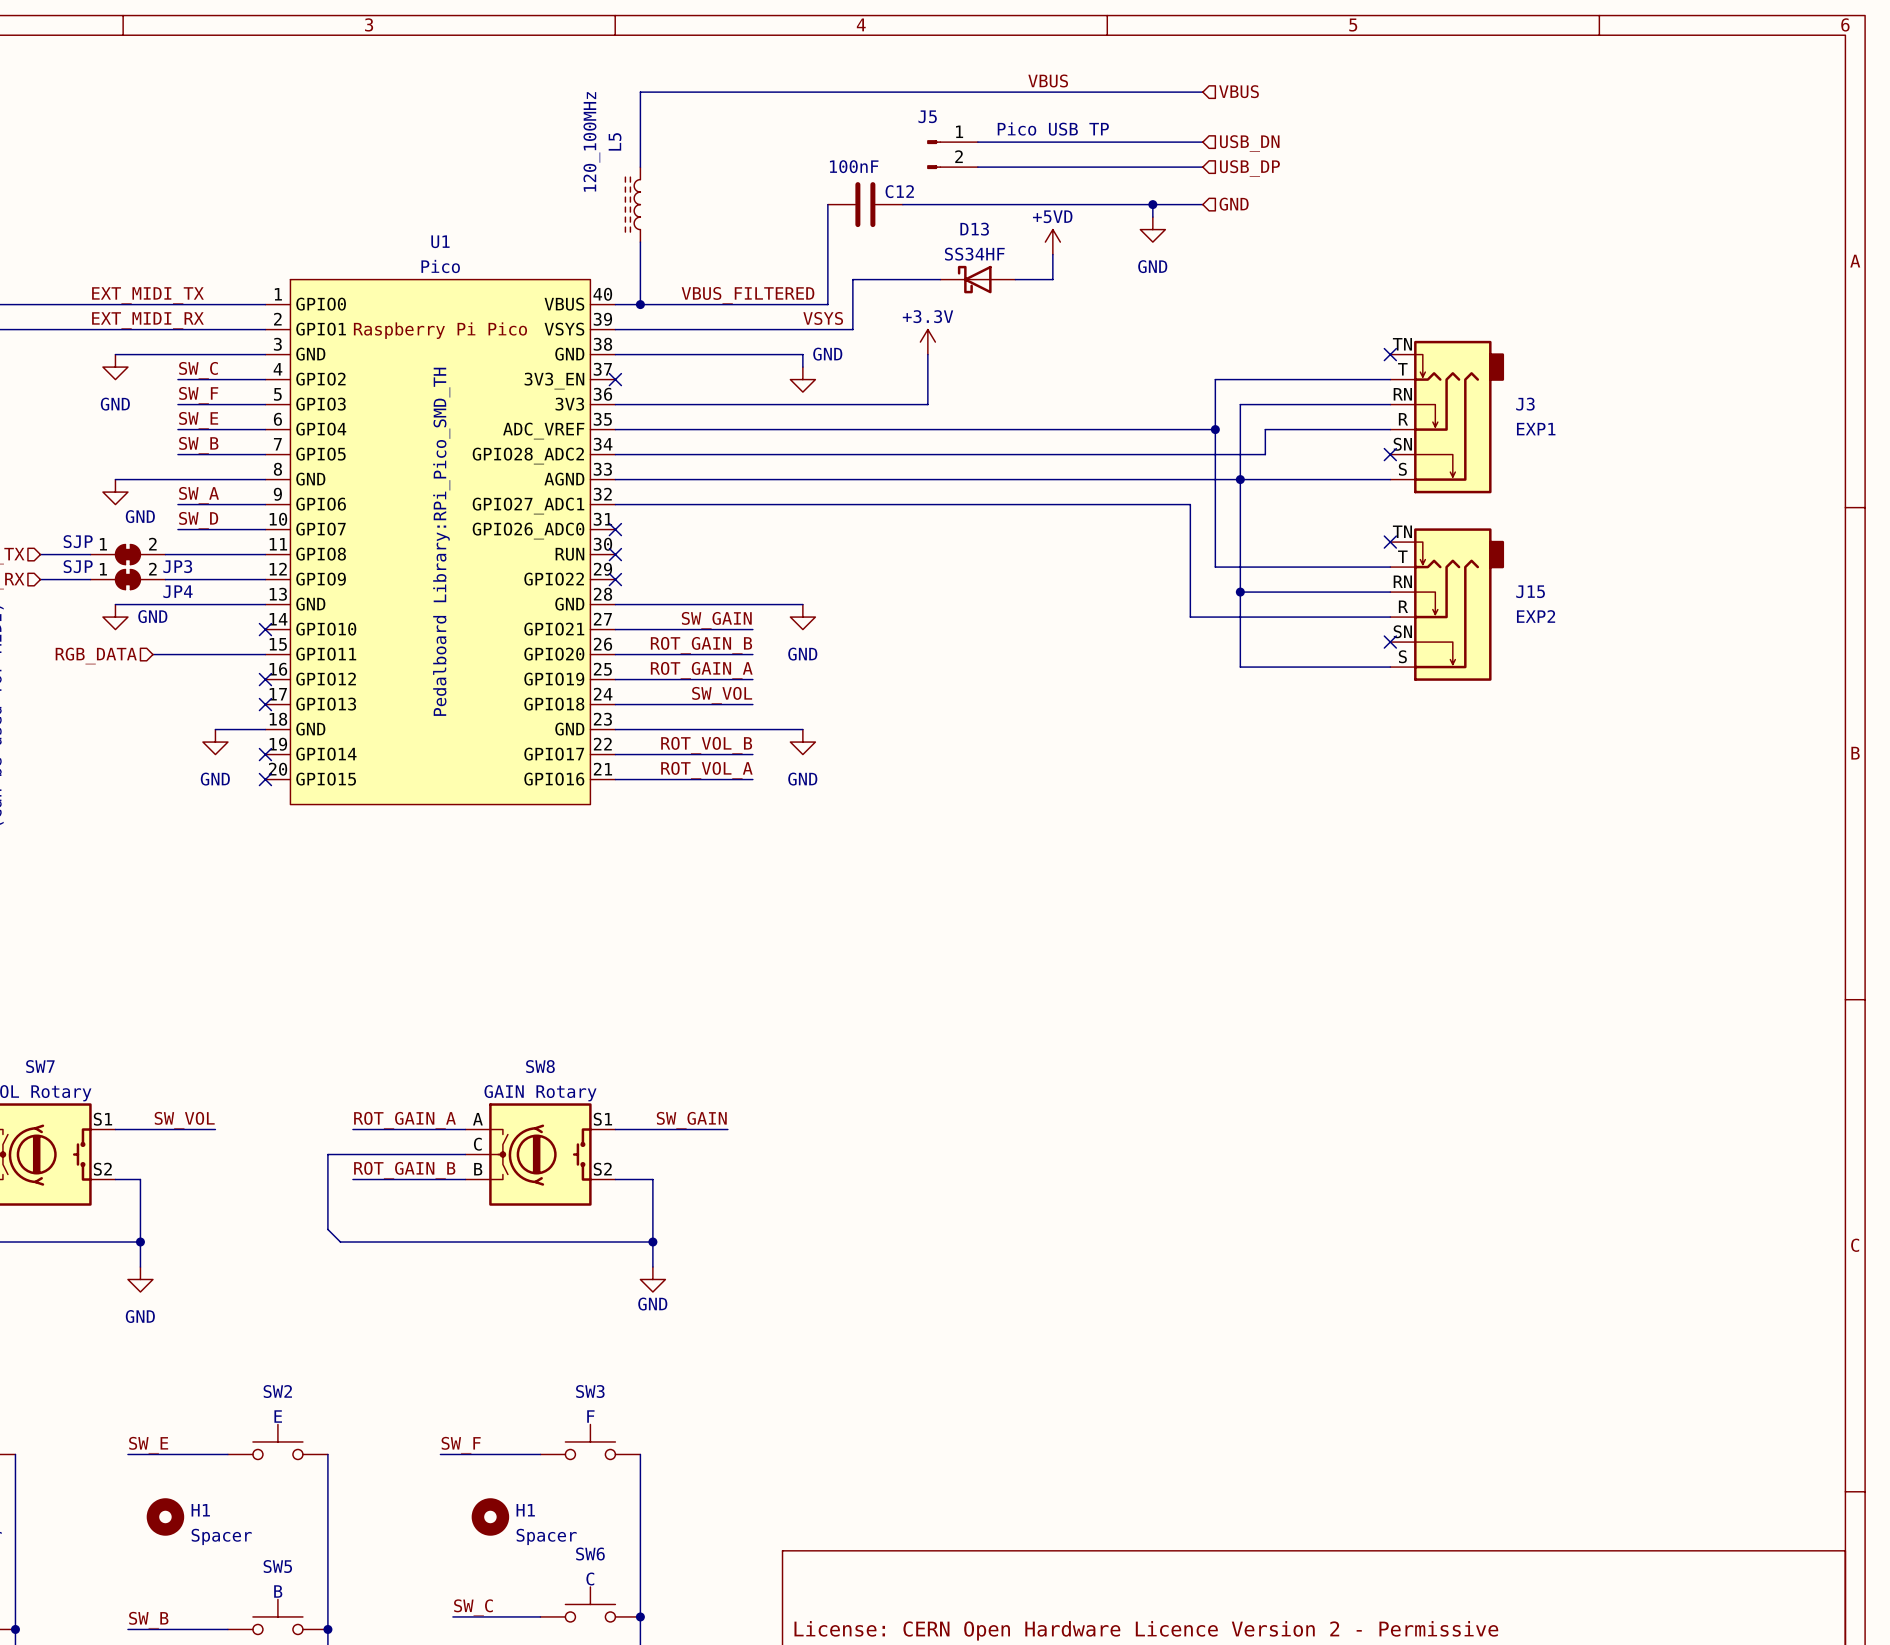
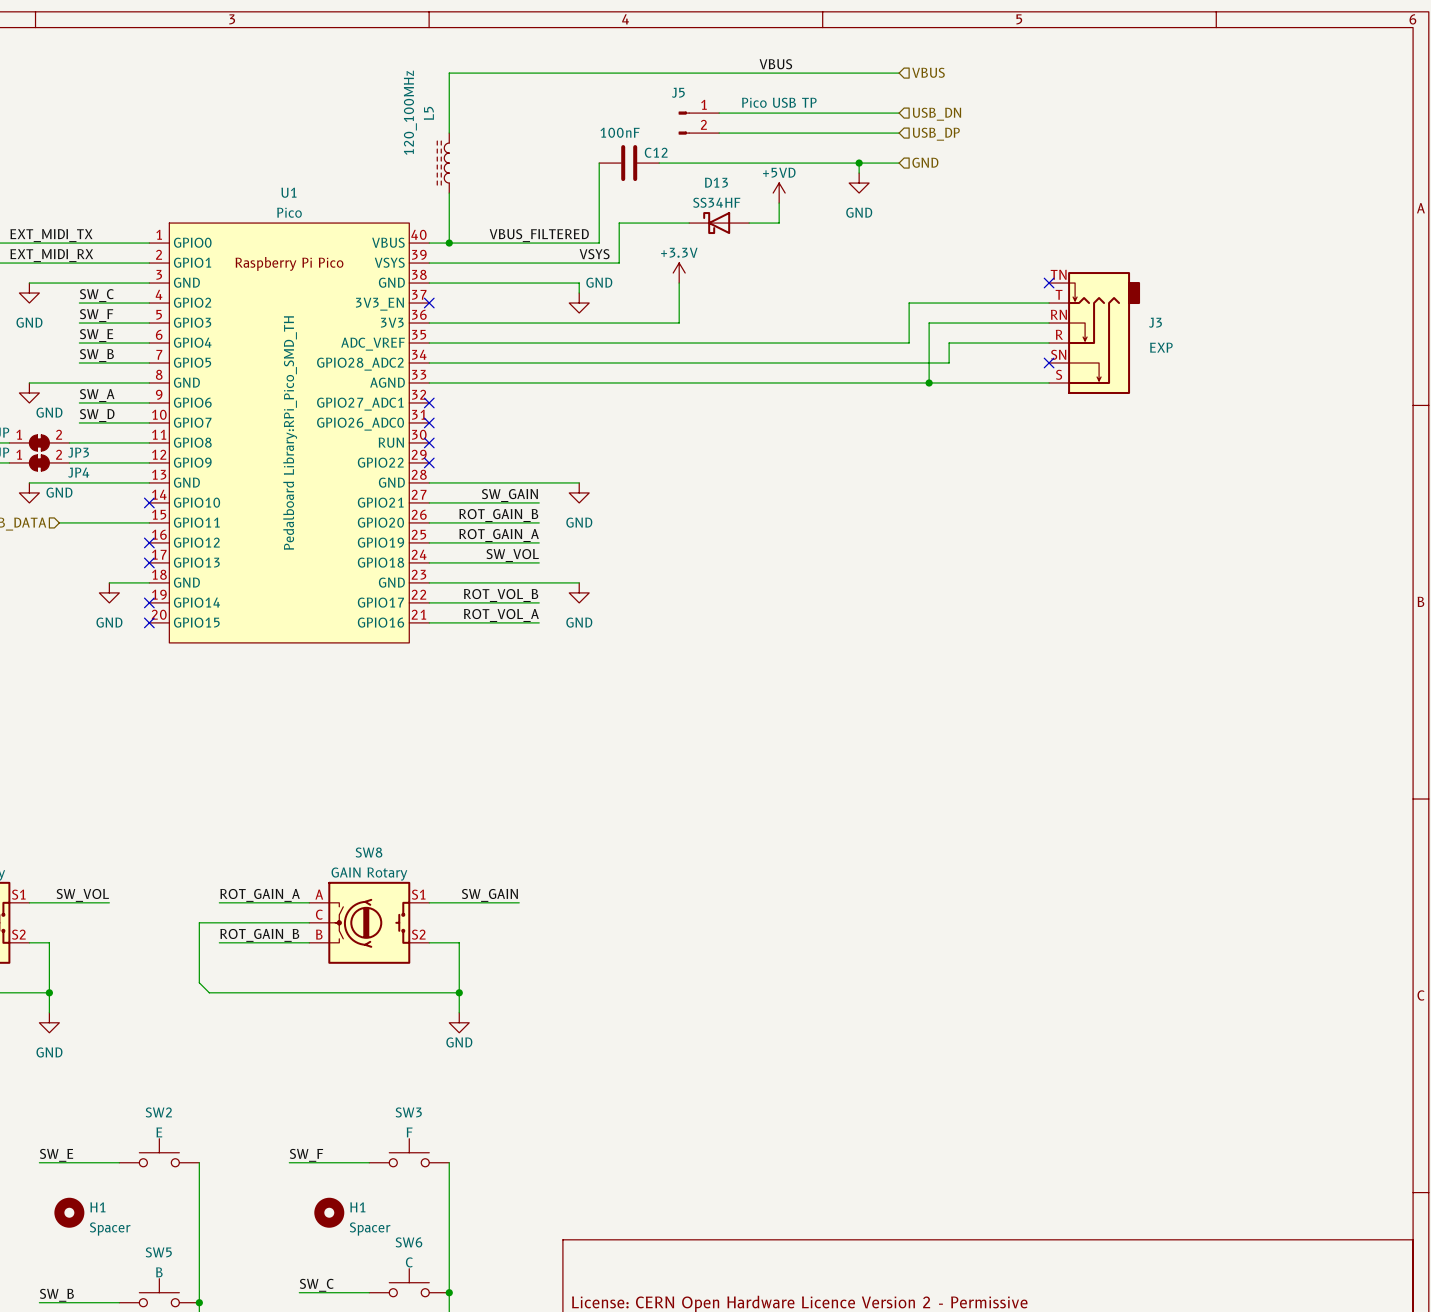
wire: (1215, 429) (1215, 567) (1390, 567) -> none
junction: (1215, 429) -> none
J3 value: EXP1 (1536, 429) -> EXP (1161, 347)
wire: (1240, 479) (1240, 667) (1390, 667) -> none
wire: (615, 504) (1190, 504) (1190, 617) (1390, 617) -> none
no-connect mark: none -> (429, 402)
no-connect mark: (1390, 542) -> none
wire: (1240, 592) (1390, 592) -> none
junction: (1240, 592) -> none
J15: EXP2 (1447, 604) -> none
no-connect mark: (1390, 642) -> none

